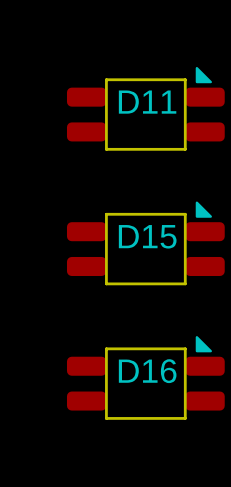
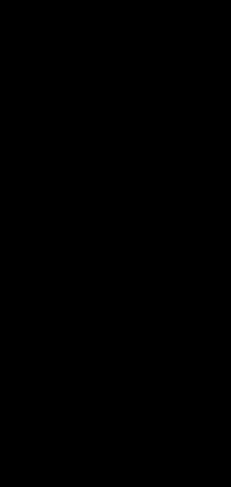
D11: (145, 108) -> none
D15: (145, 243) -> none
D16: (145, 377) -> none

